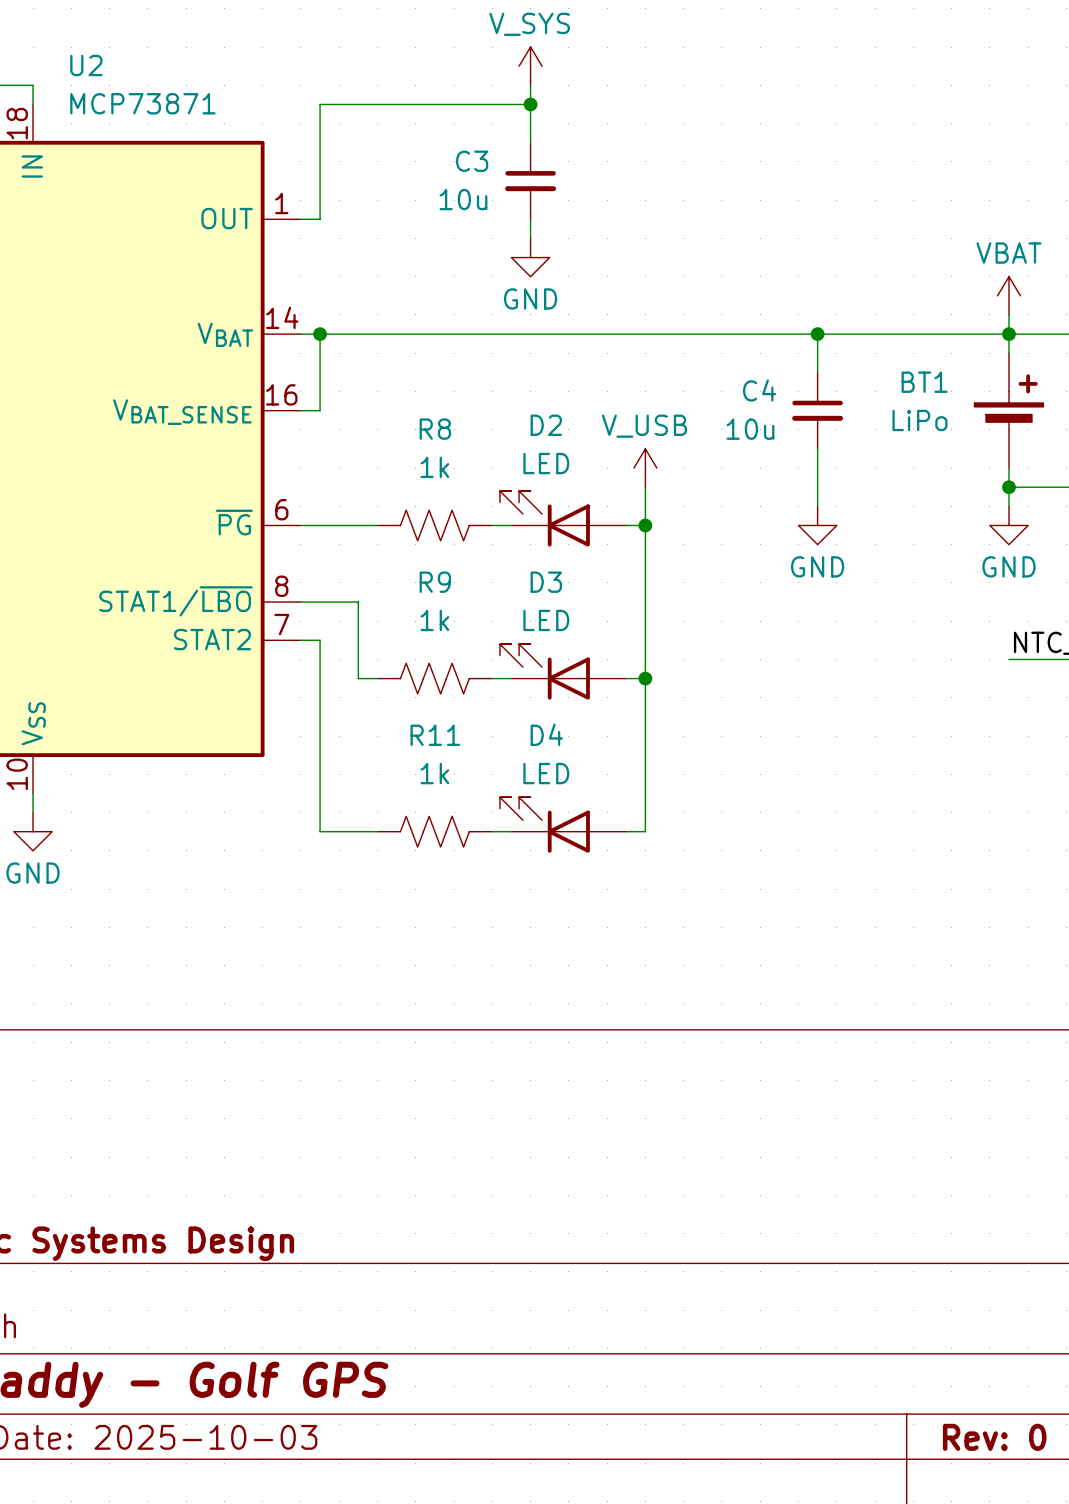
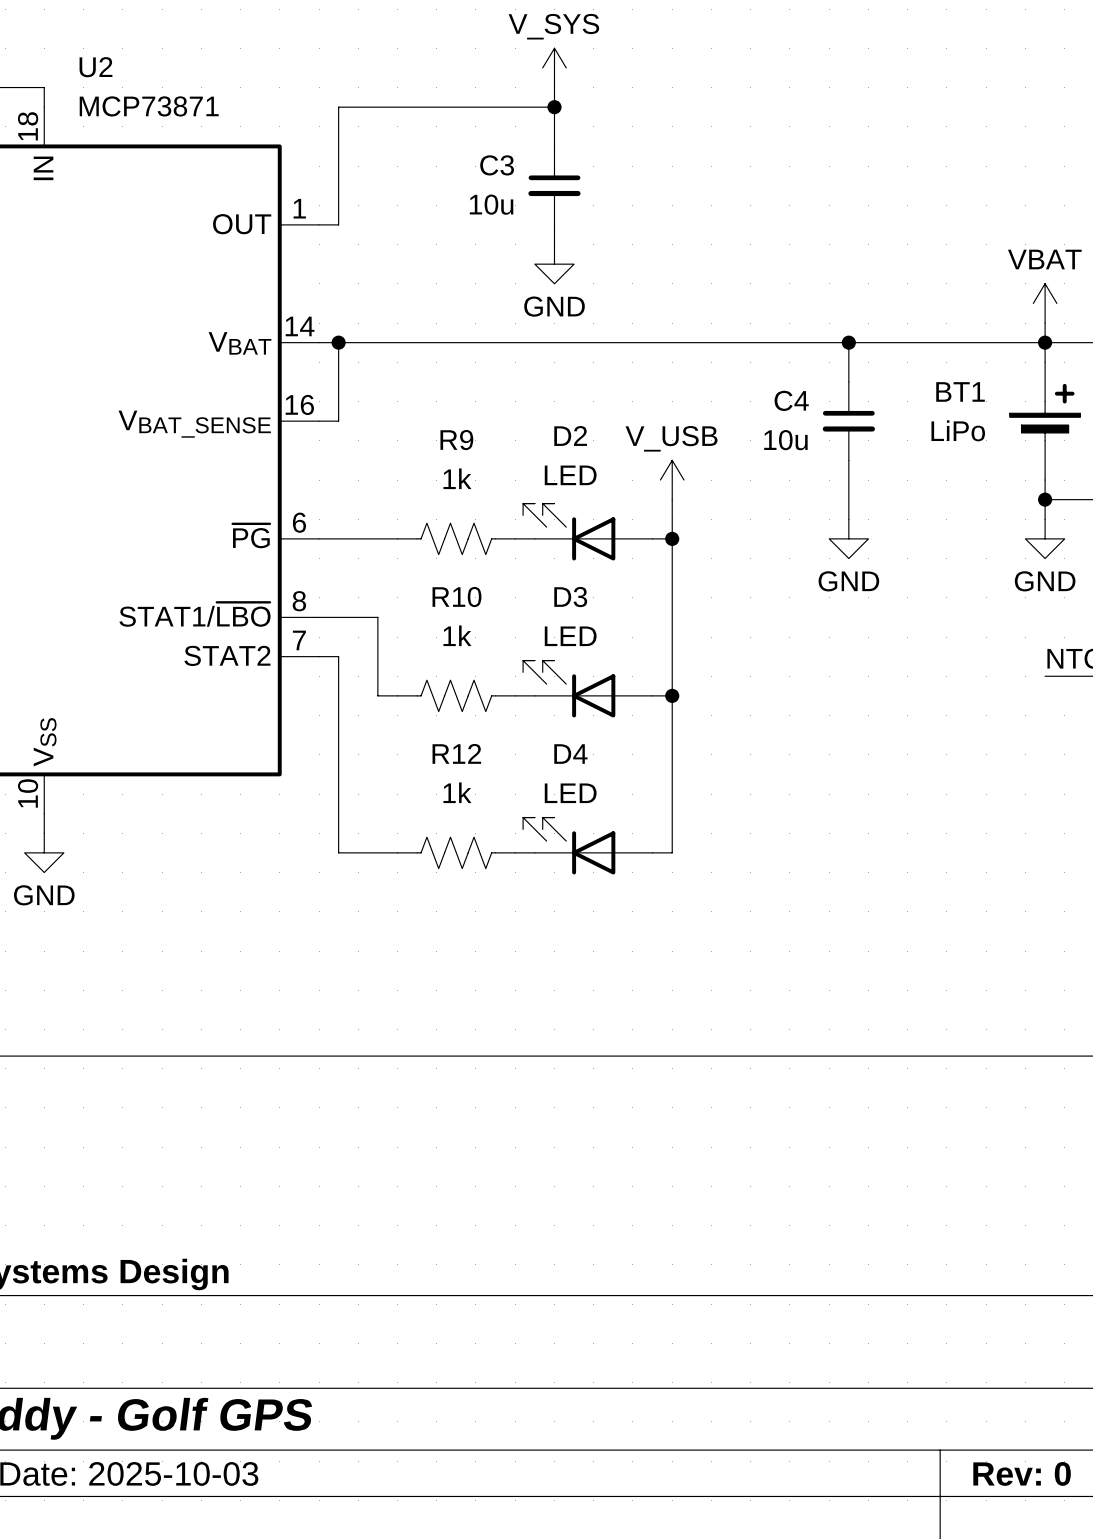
R8 name: R8 (435, 429) -> R9 (456, 440)
R9 name: R9 (435, 582) -> R10 (456, 597)
R11 name: R11 (435, 735) -> R12 (456, 753)

